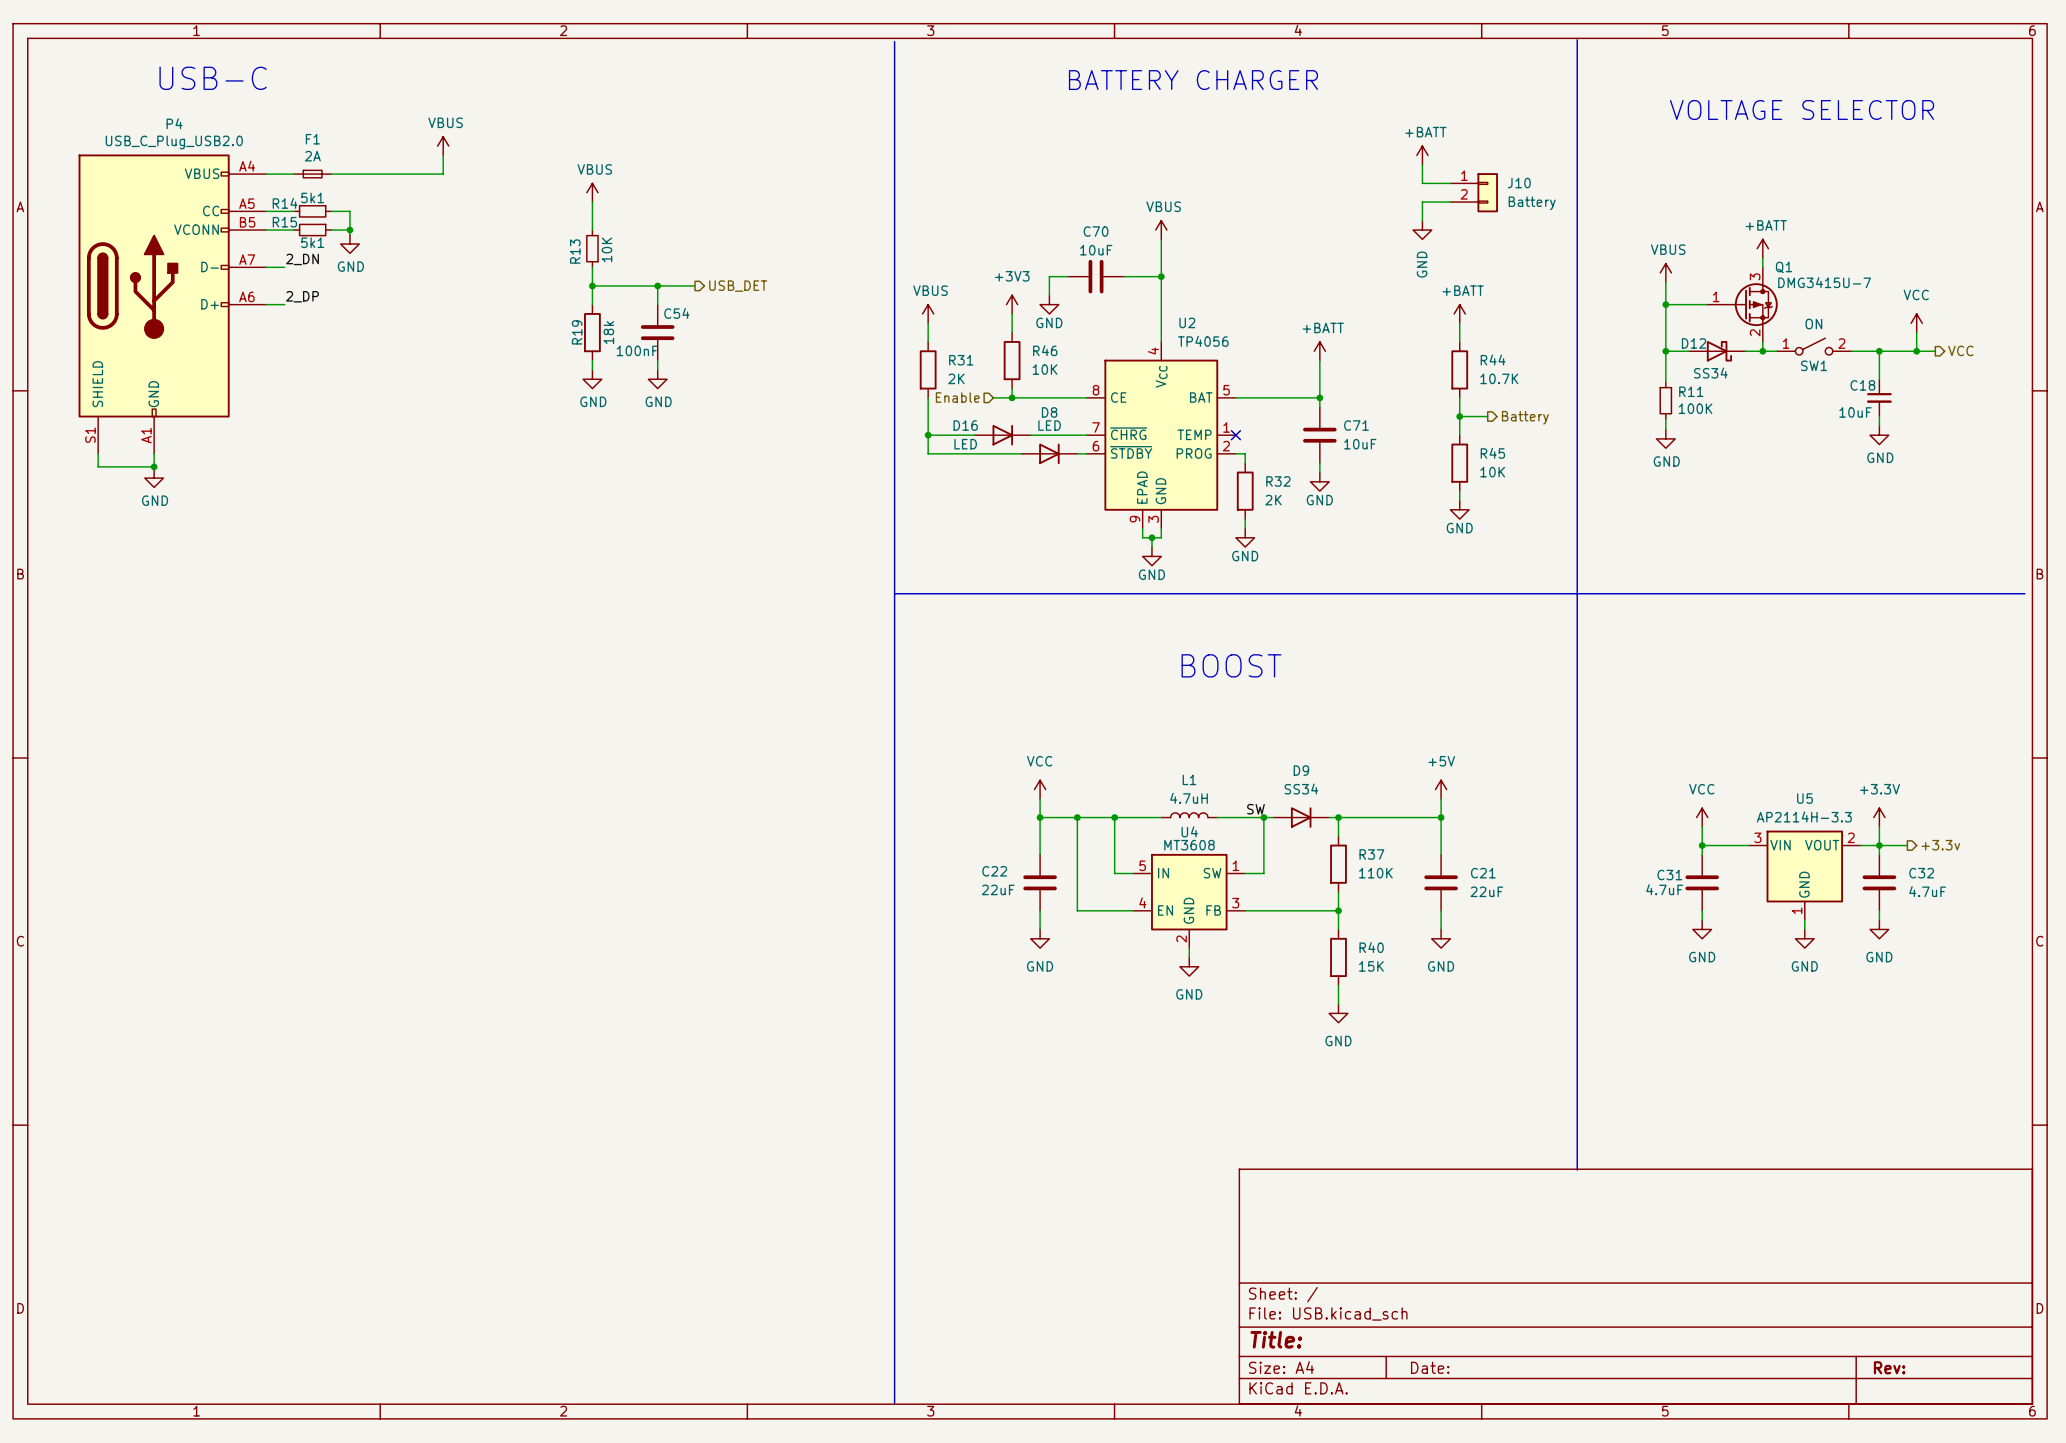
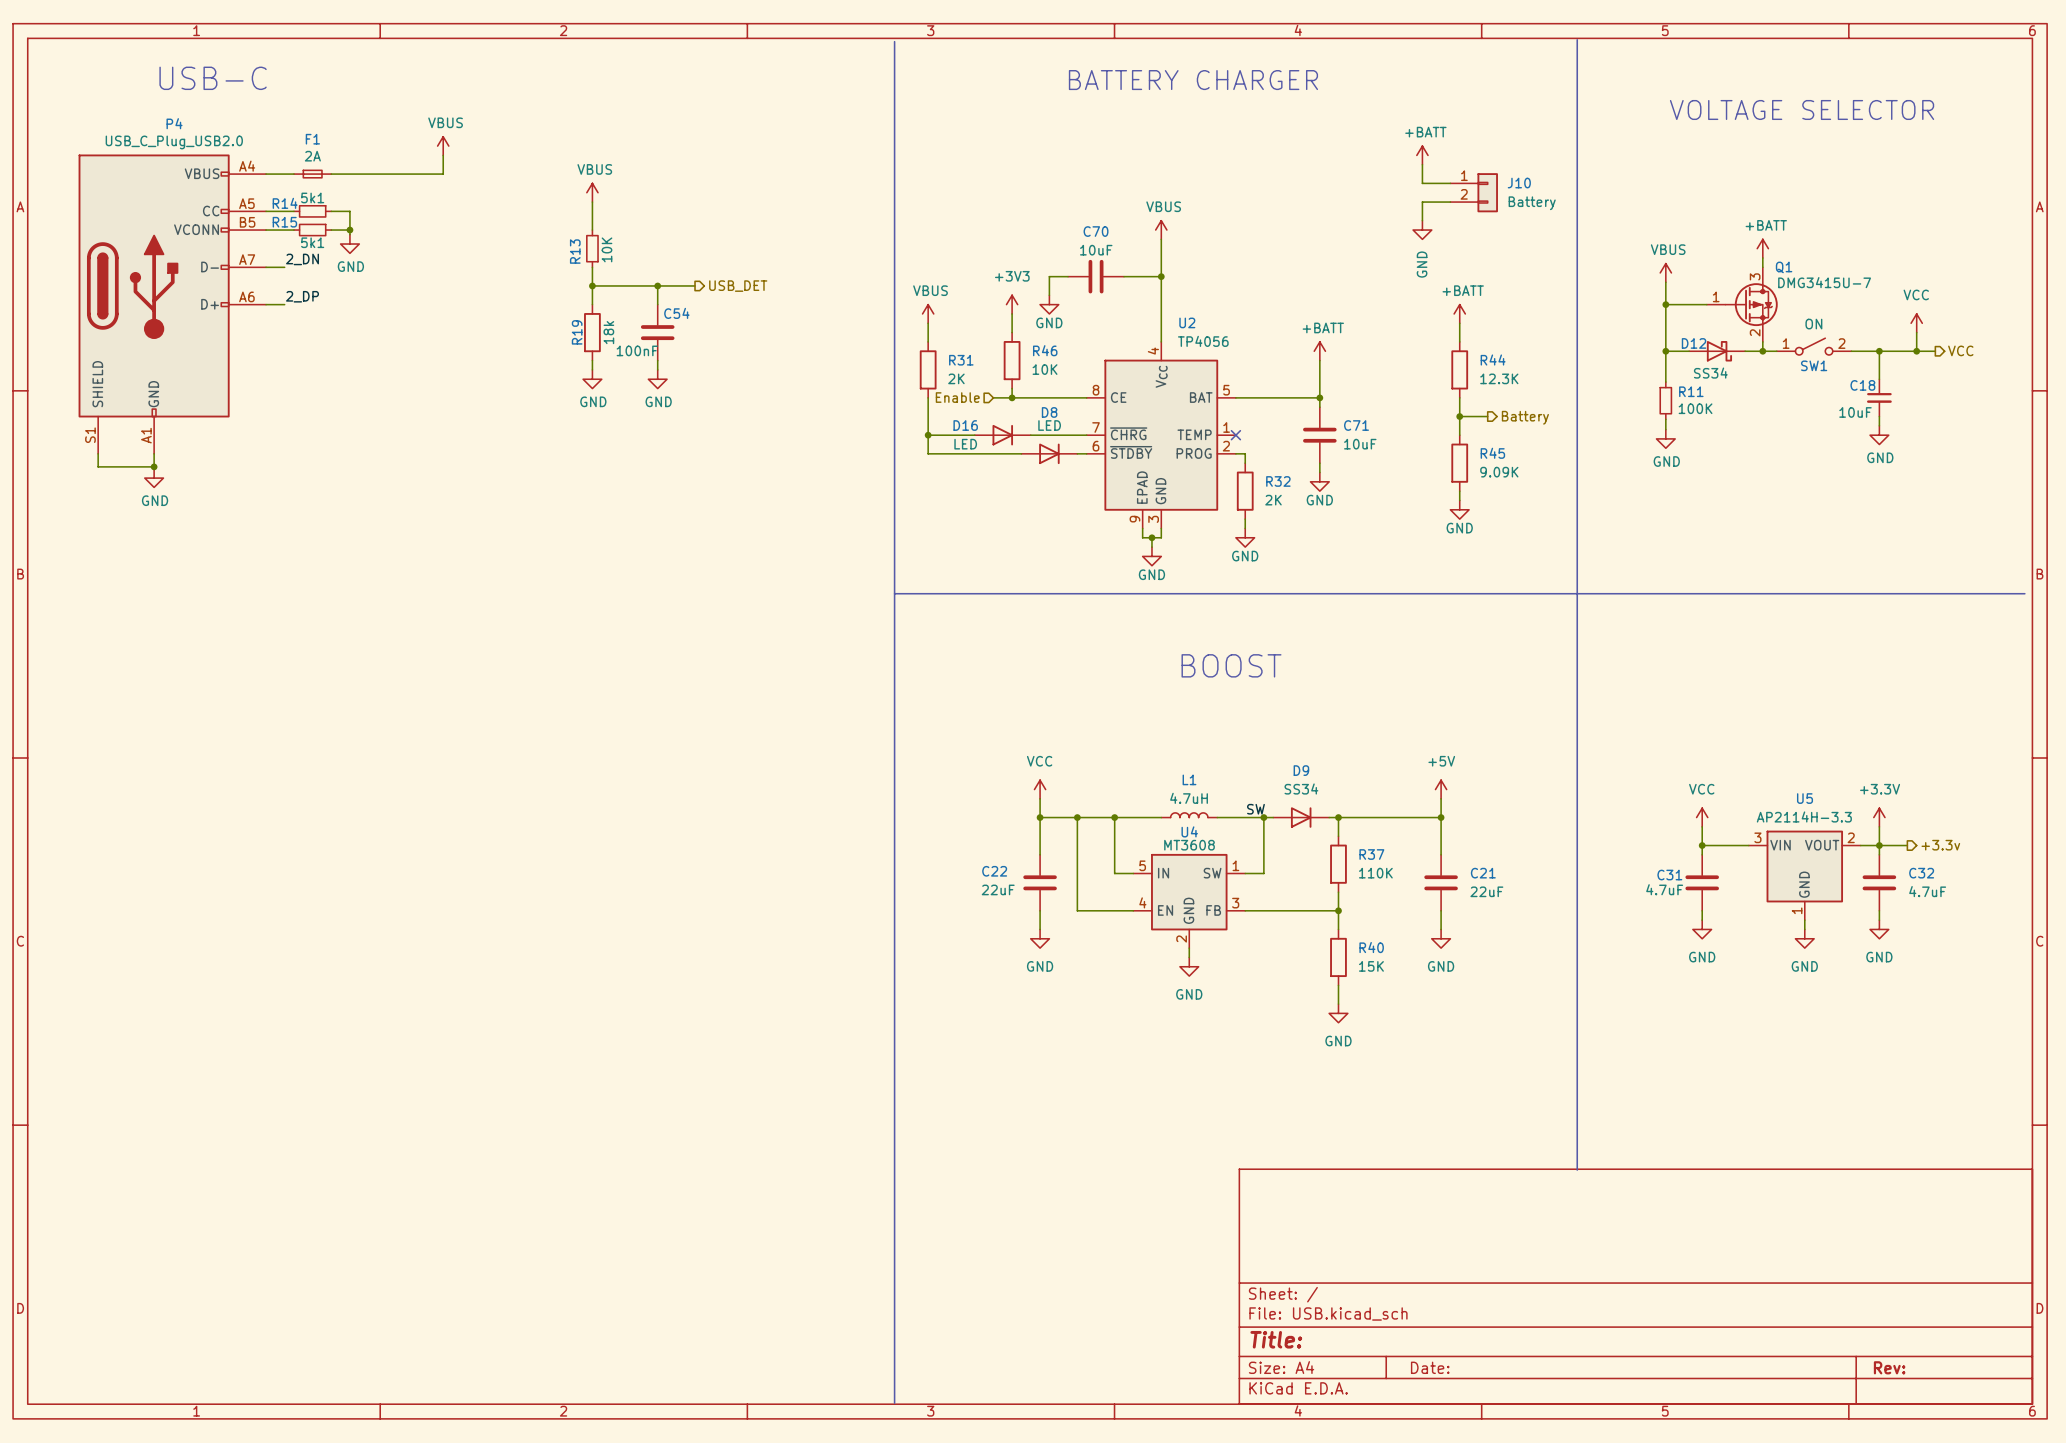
R44 value: 10.7K (1499, 378) -> 12.3K (1499, 378)
R45 value: 10K (1492, 472) -> 9.09K (1499, 472)

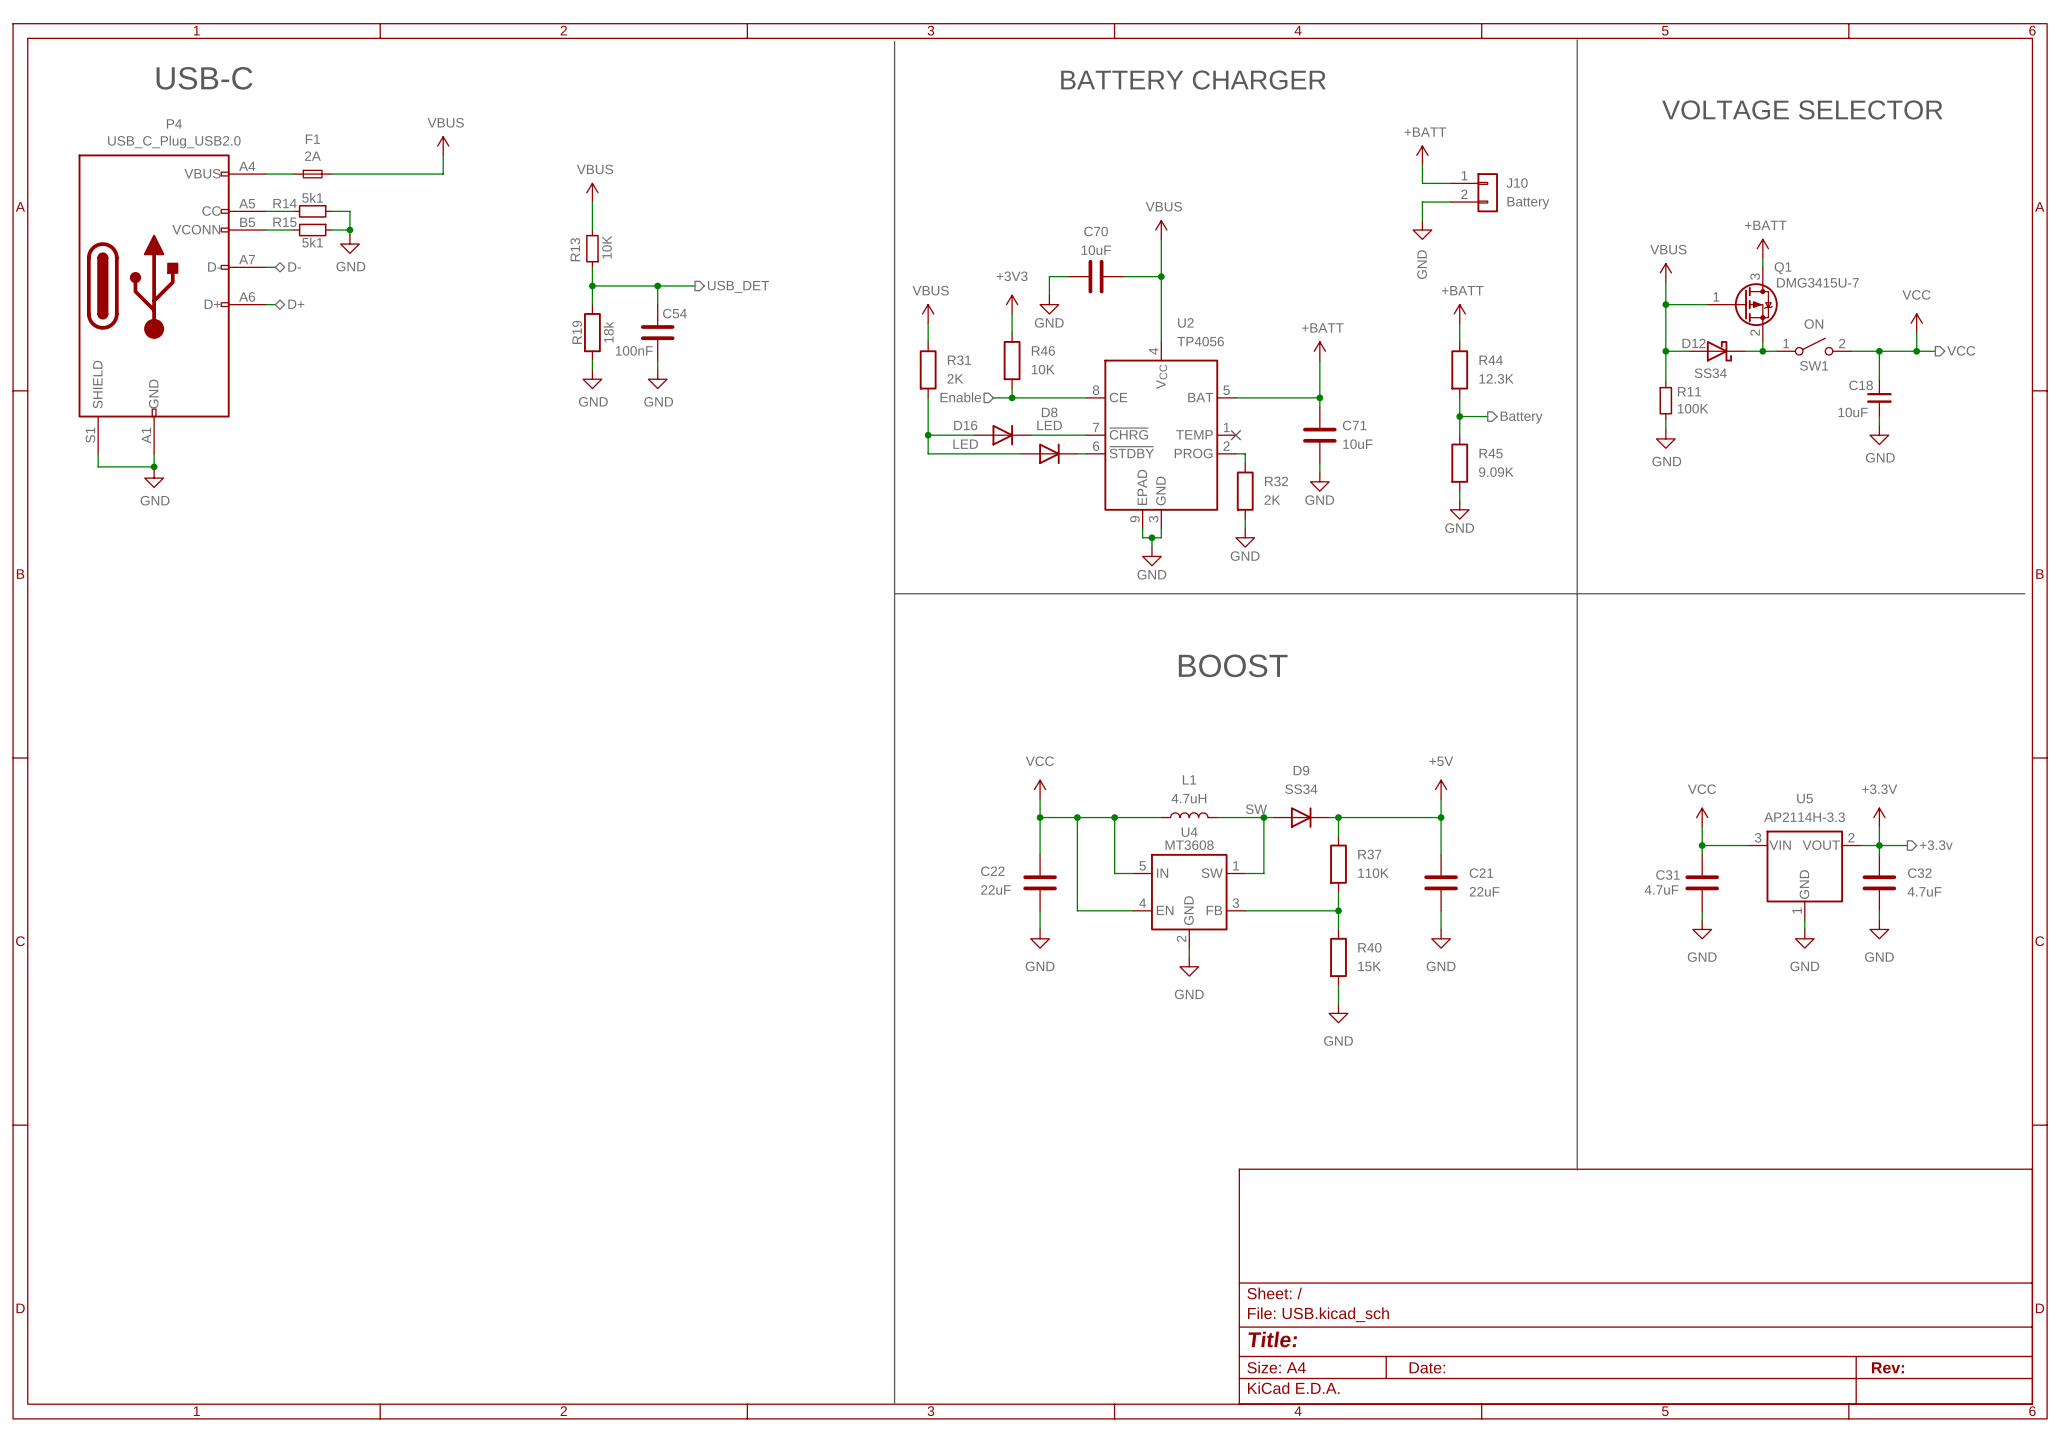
label: 2_DN (302, 259) -> none
hierarchical label: none -> D- (294, 266)
wire: (275, 267) (284, 267) -> none
label: 2_DP (302, 296) -> none
wire: (275, 304) (284, 304) -> none
hierarchical label: none -> D+ (296, 304)

